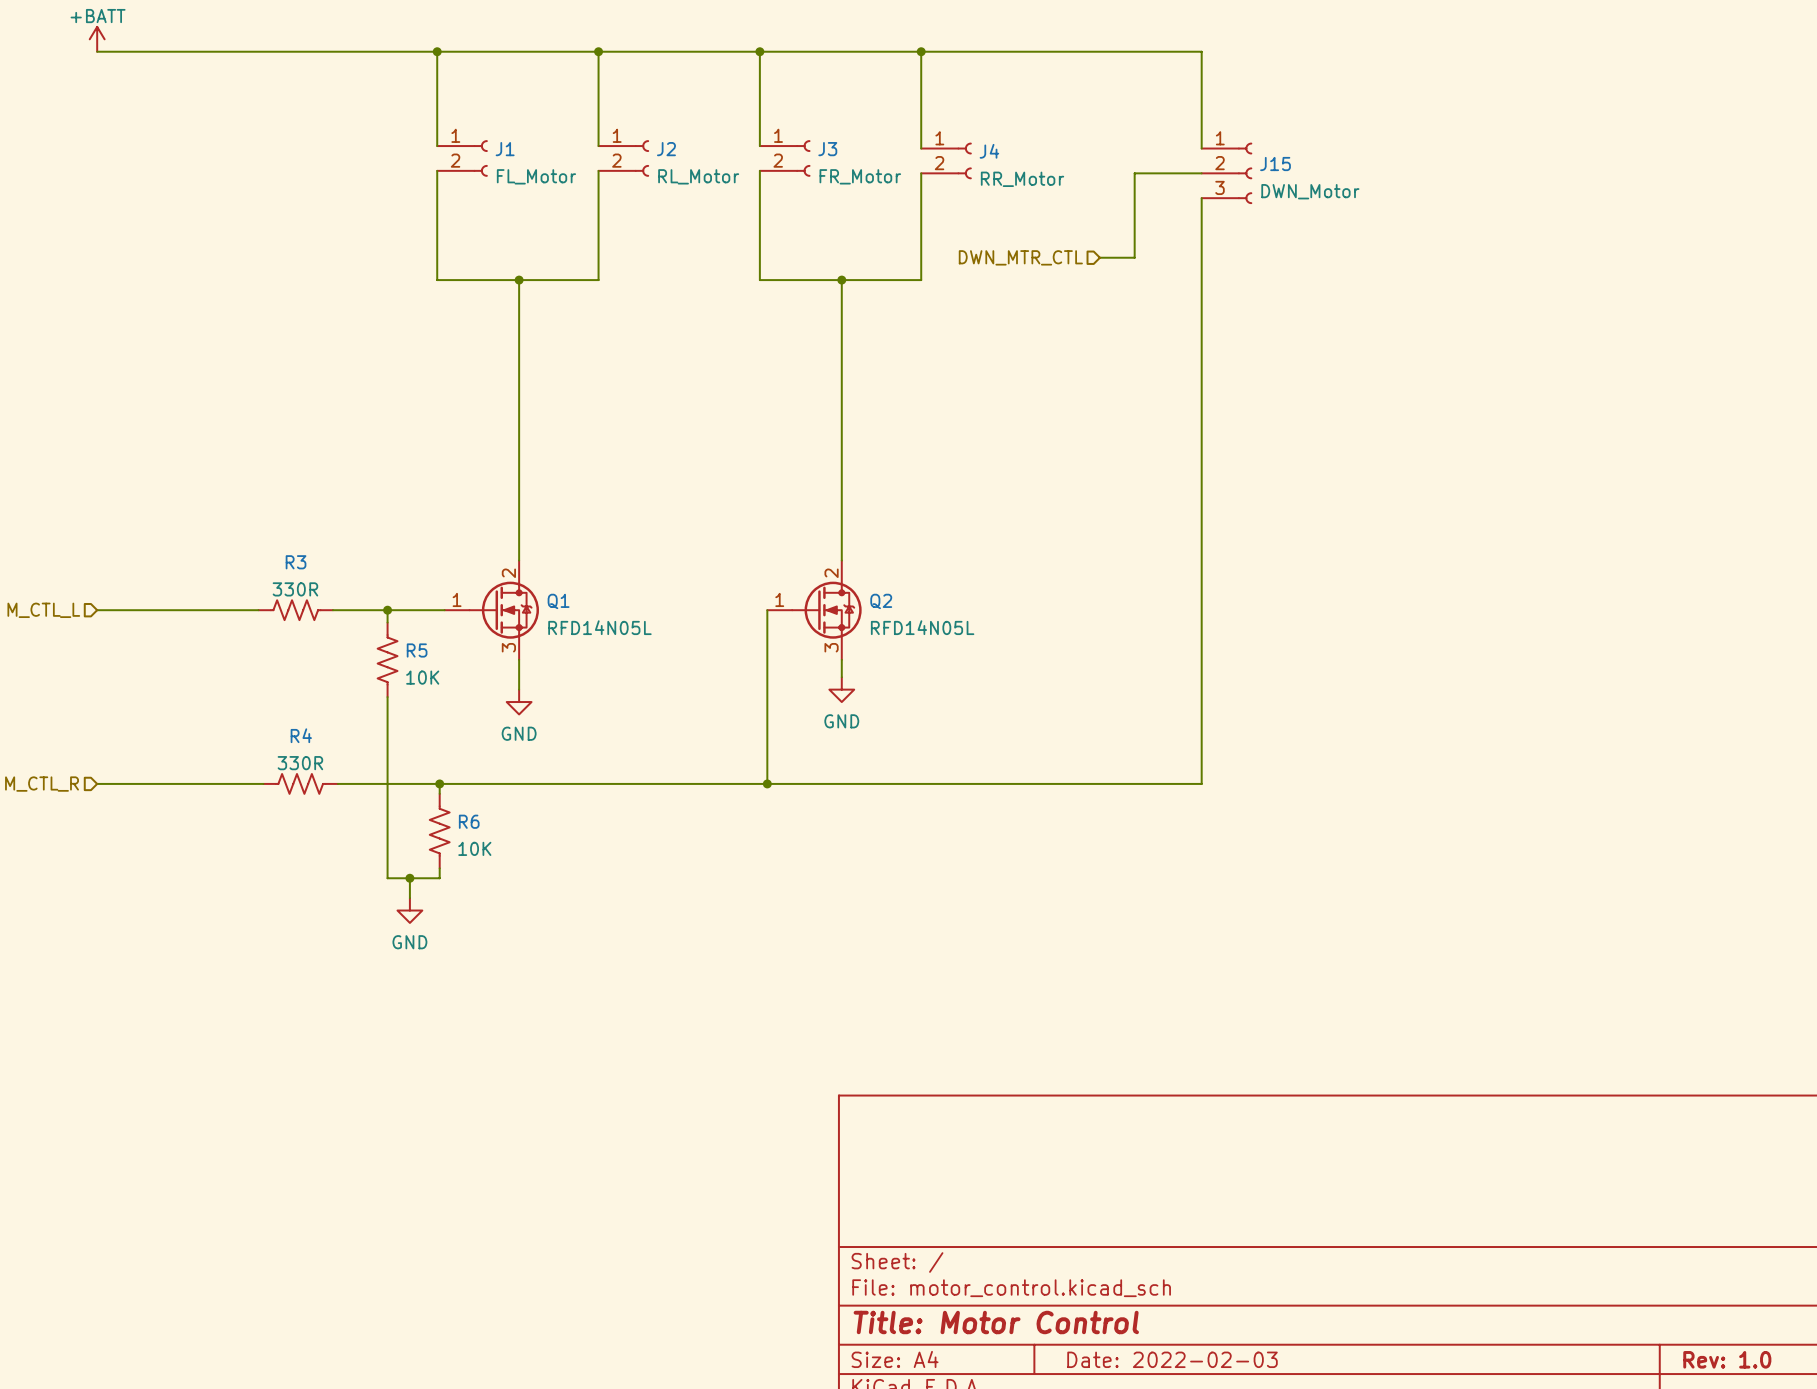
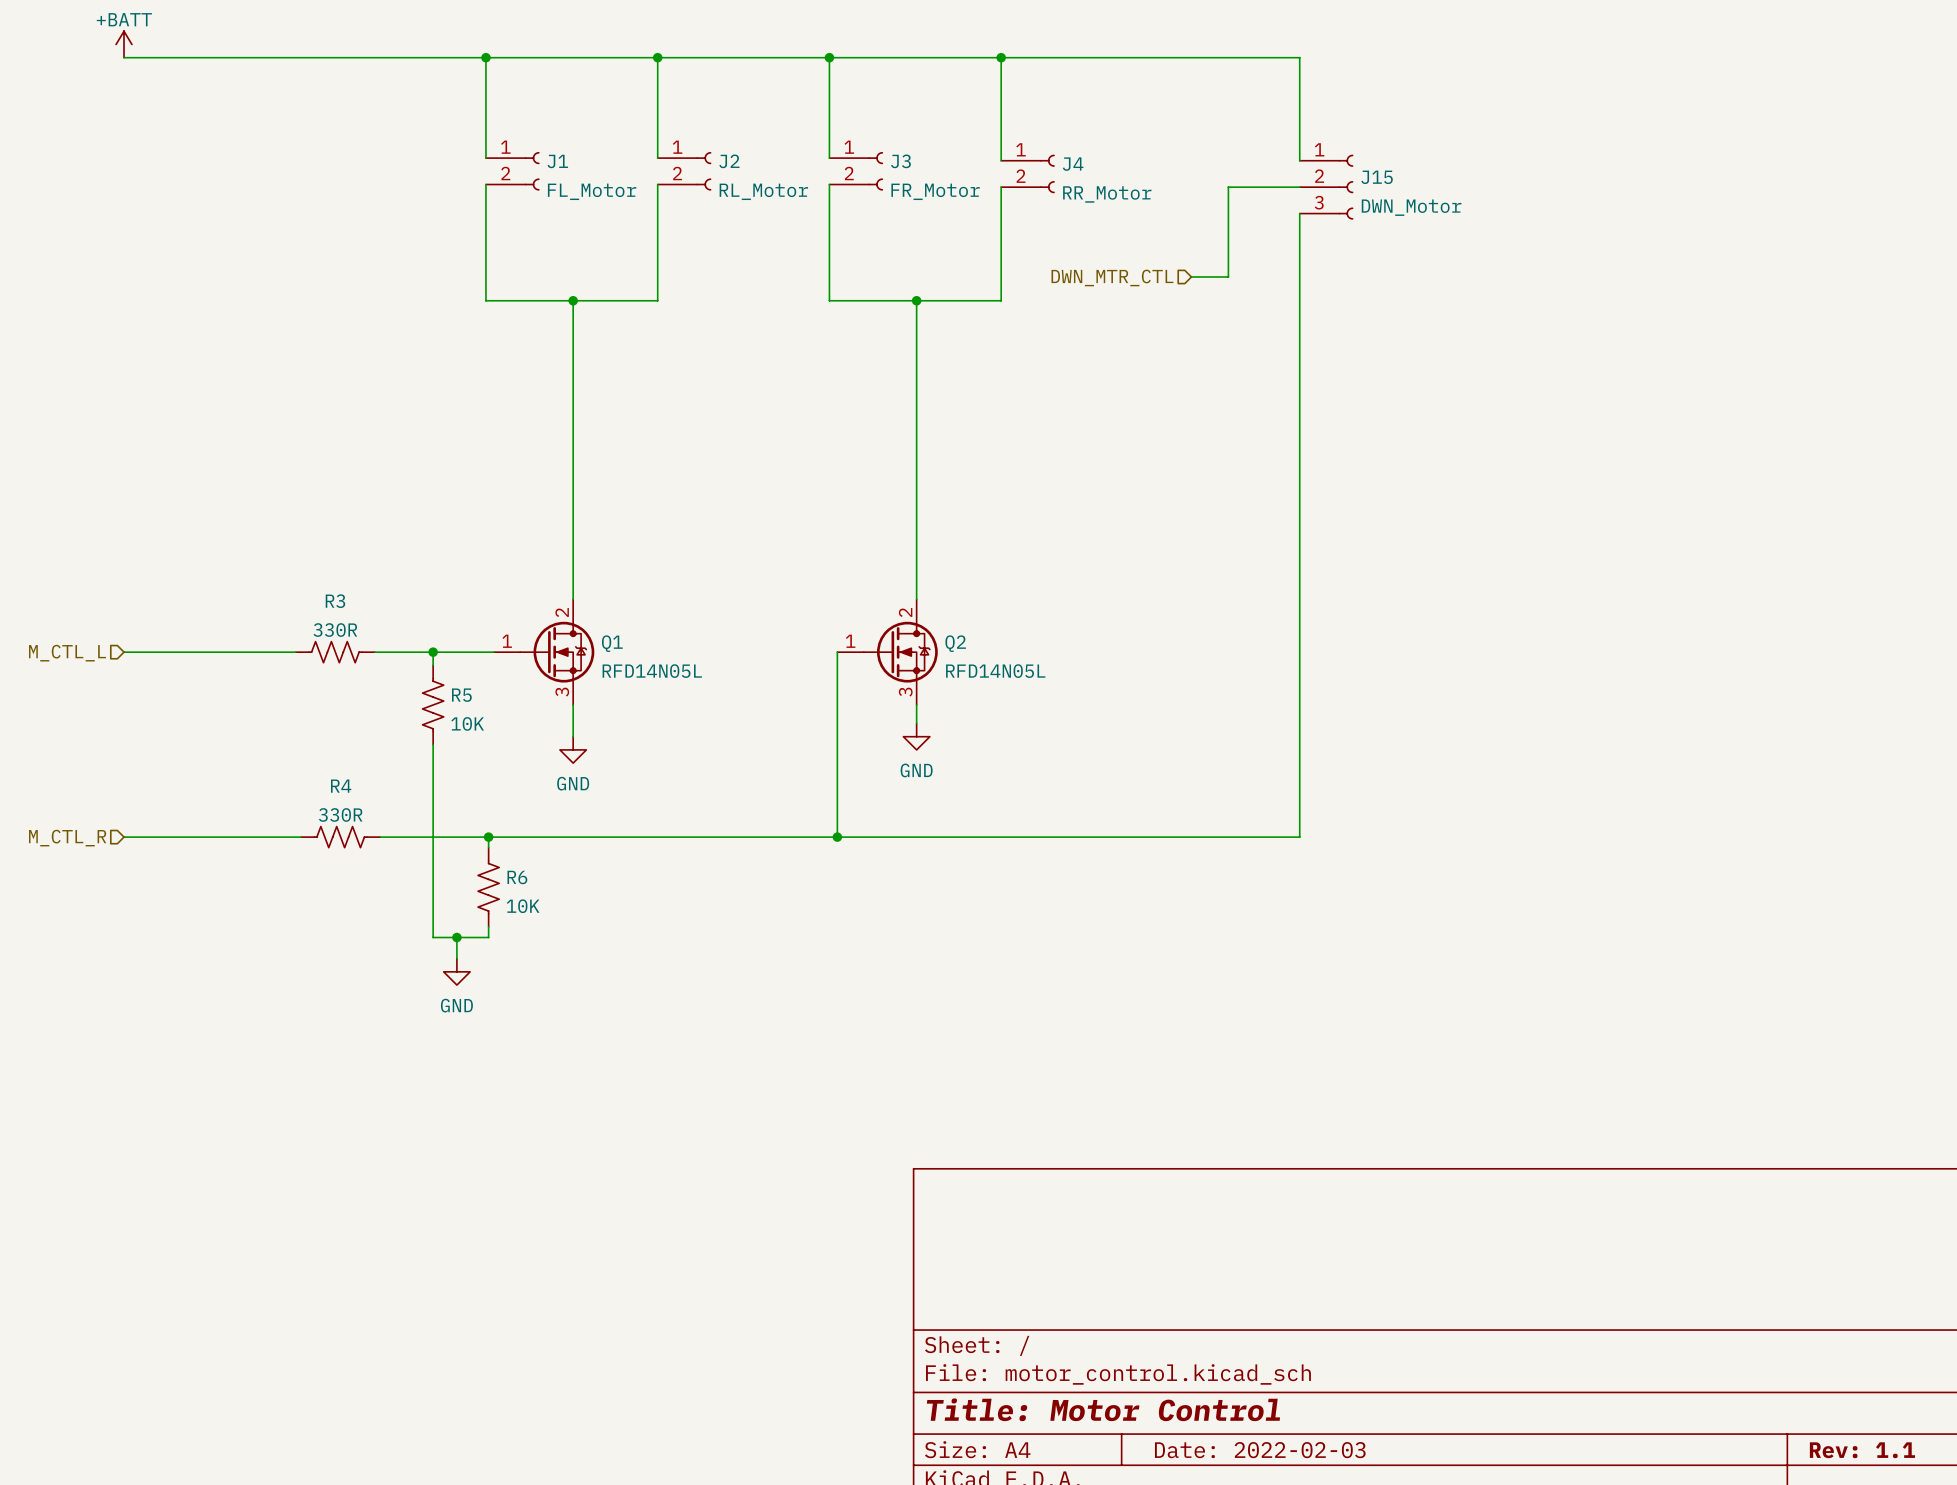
title block: Rev: 1.0 (1727, 1359) -> Rev: 1.1 (1862, 1450)

